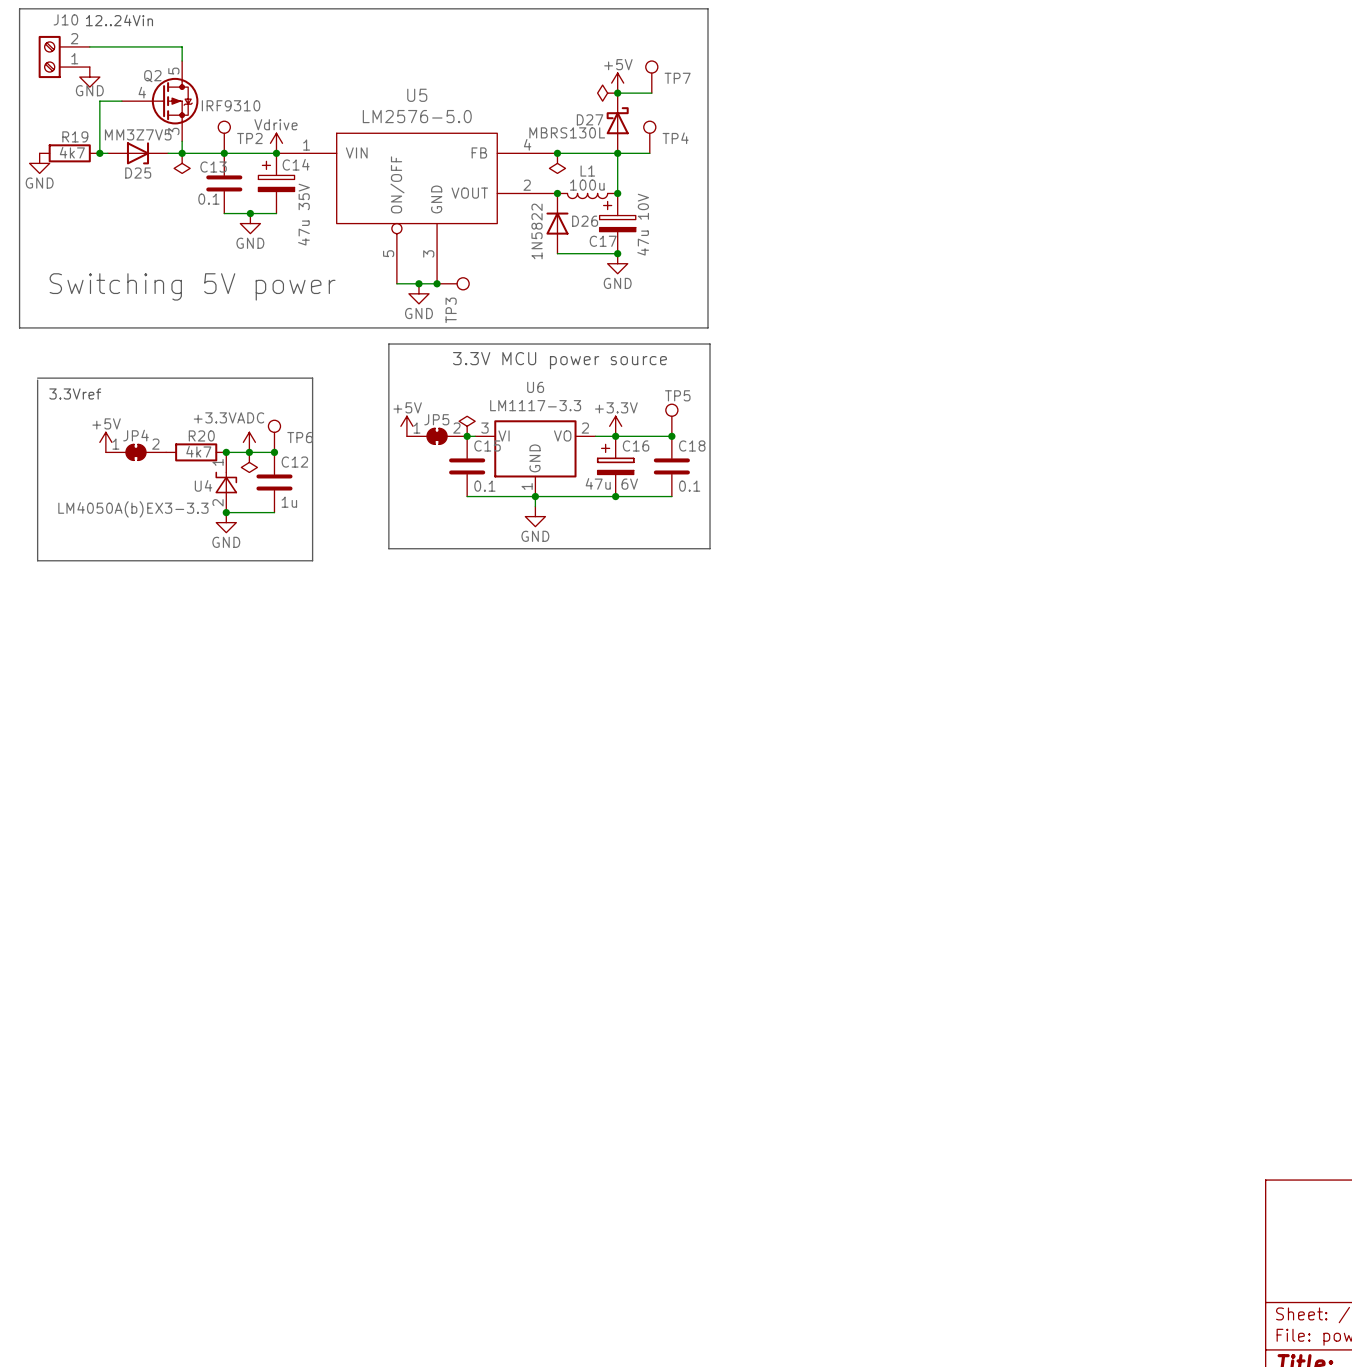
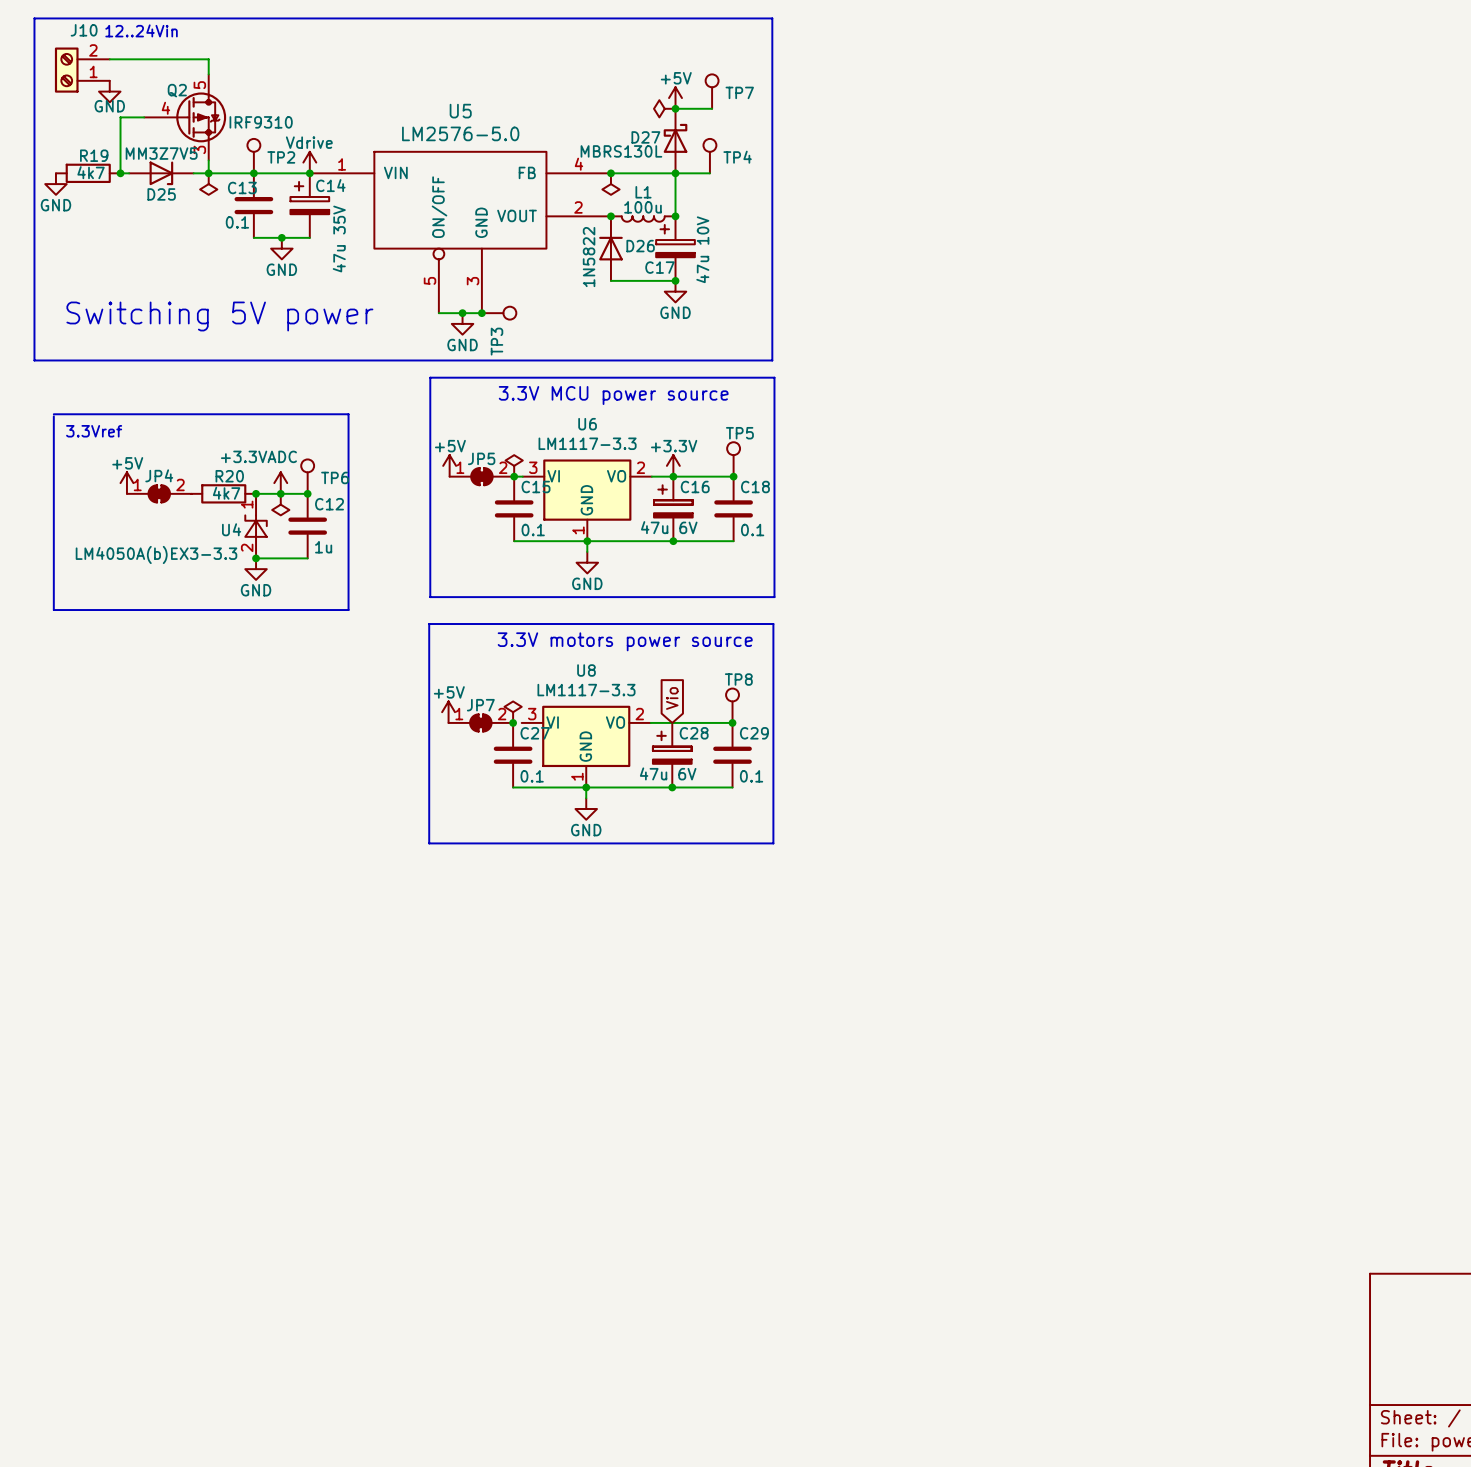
line: none -> (429, 624) (429, 843) (773, 843) (773, 624) (429, 624)
text: none -> 3.3V motors power source (625, 641)
global label: none -> Vio (672, 698)
TP8: none -> (732, 705)
power symbol: none -> +5V (448, 712)
power symbol: none -> (513, 712)
JP7: none -> (480, 722)
junction: none -> (513, 722)
wire: none -> (650, 722) (732, 722)
junction: none -> (732, 722)
U8: none -> LM1117-3.3 (586, 746)
C27: none -> 0.1 (513, 755)
C28: none -> 47u 6V (672, 755)
C29: none -> 0.1 (732, 755)
wire: none -> (513, 787) (732, 787)
wire: none -> (586, 787) (586, 798)
junction: none -> (586, 787)
junction: none -> (672, 787)
power symbol: none -> GND (586, 809)

